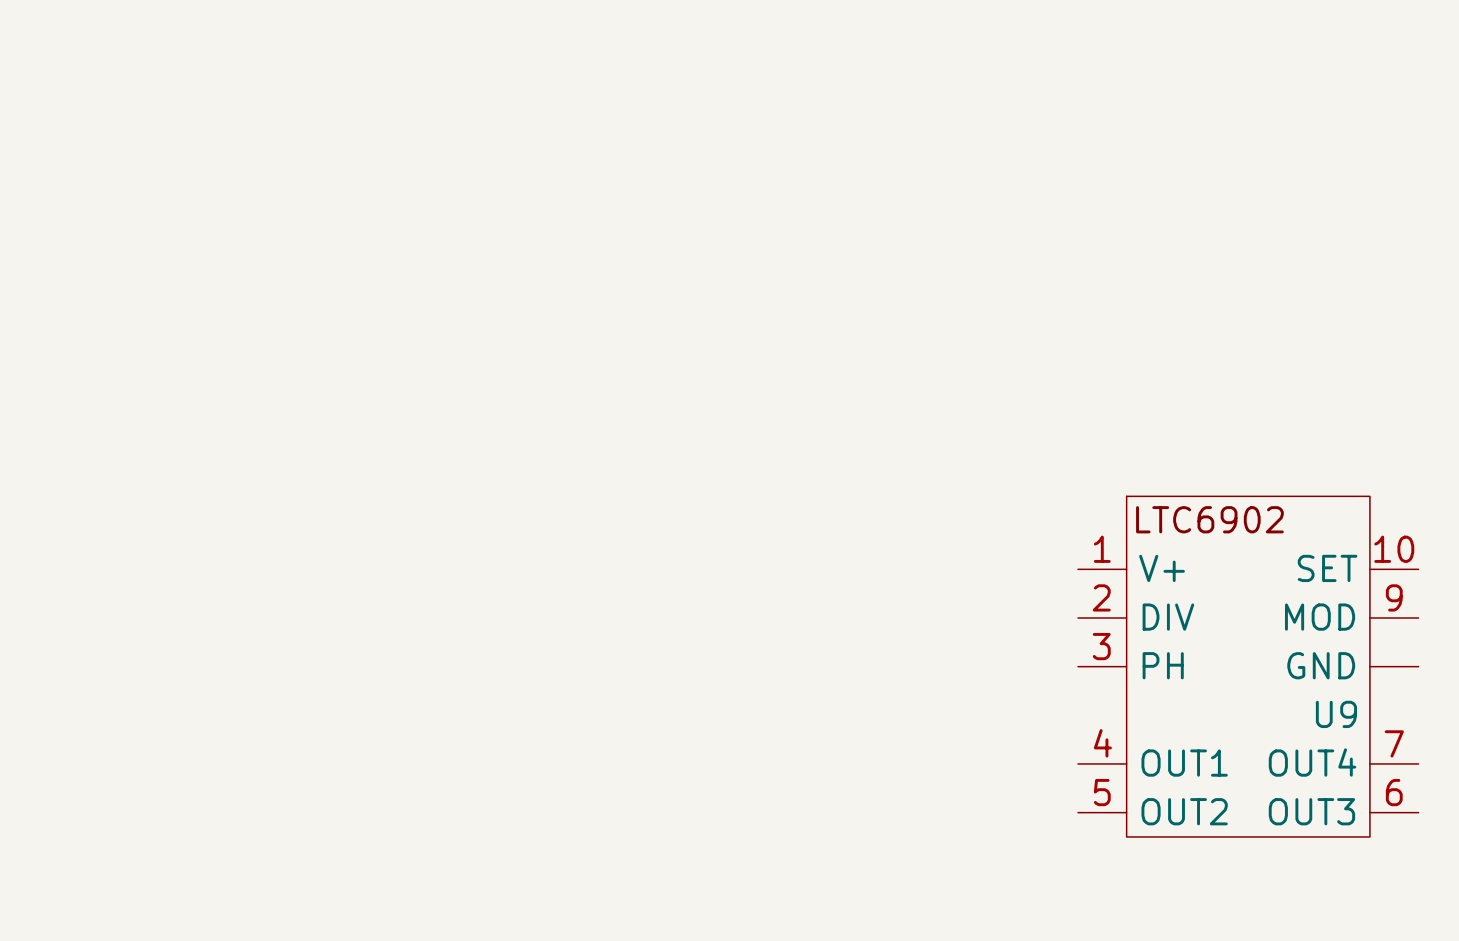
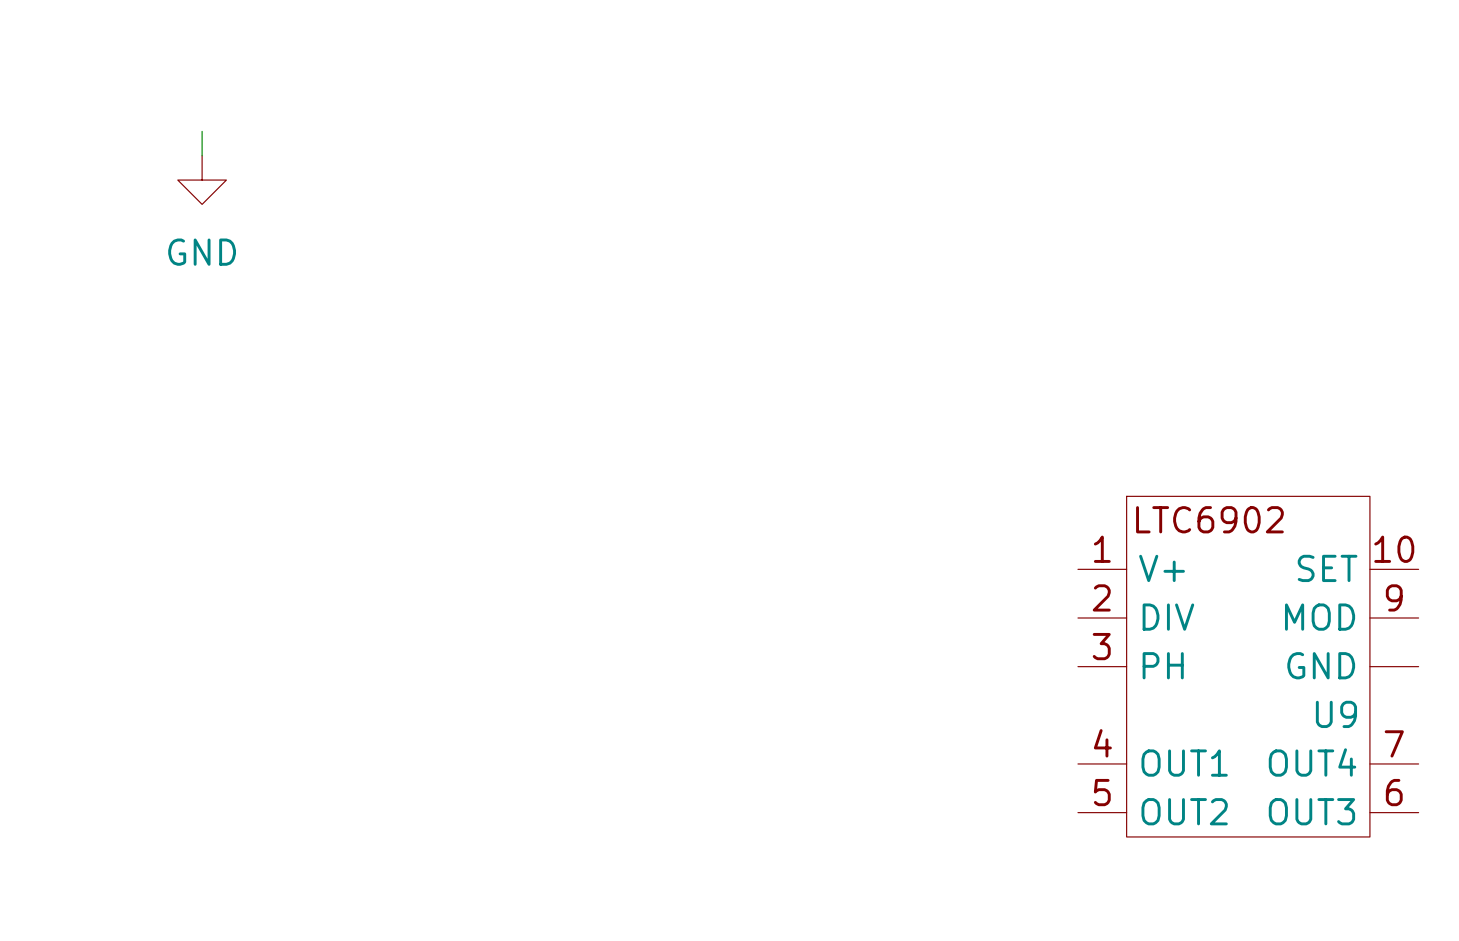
wire: none -> (202, 131) (202, 155)
power symbol: none -> GND (202, 180)

